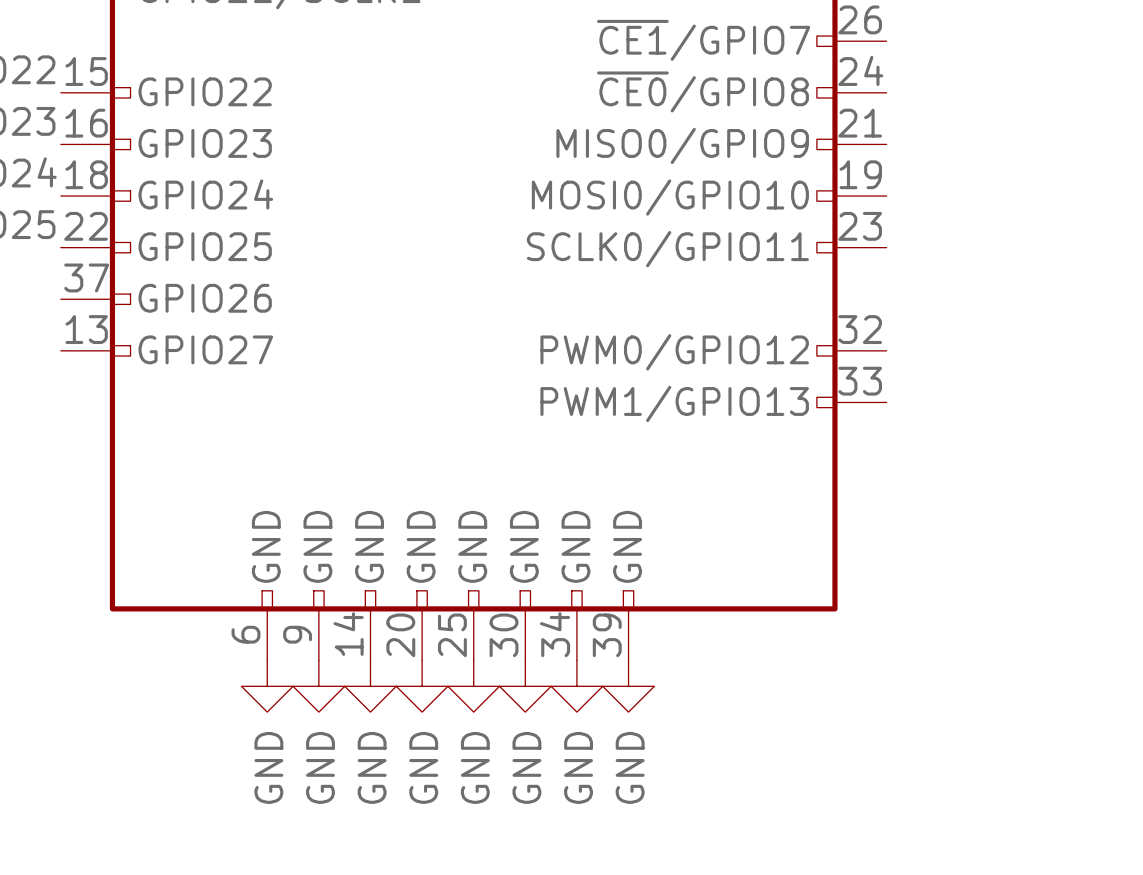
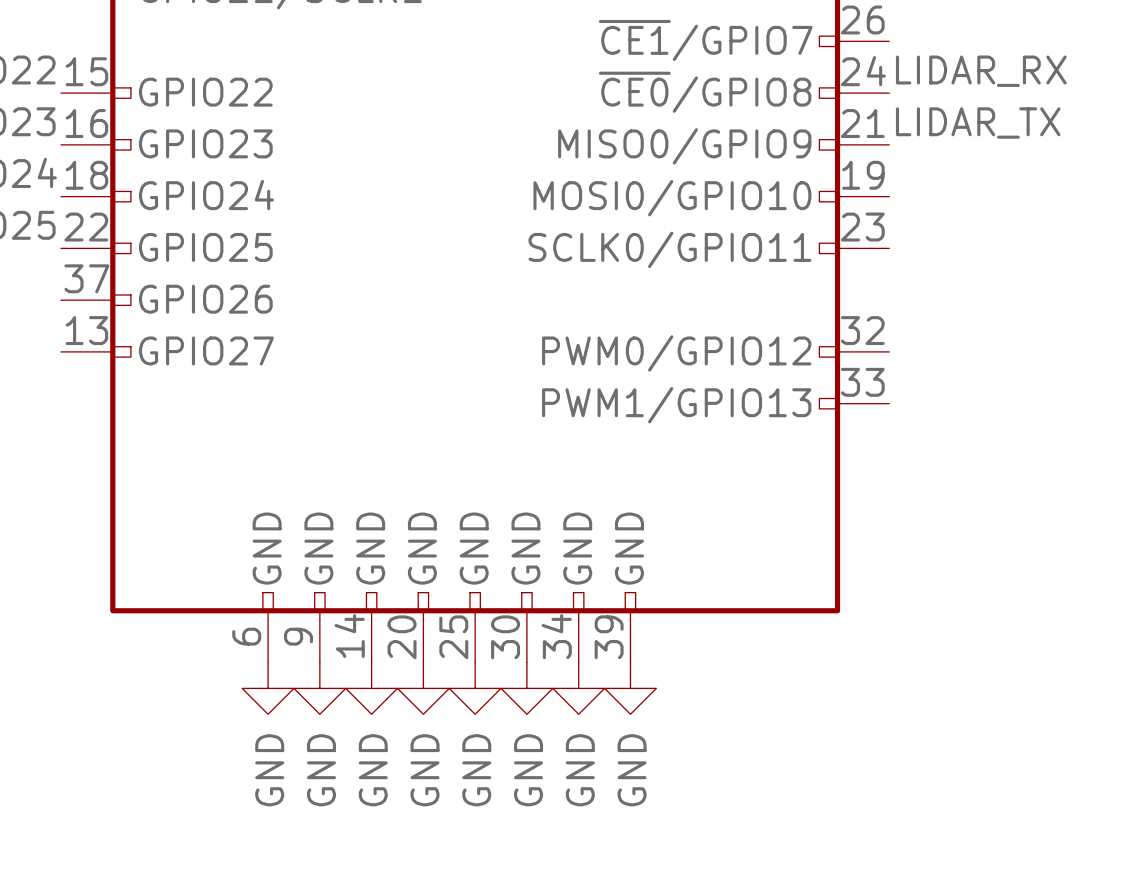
label: none -> LIDAR_RX (981, 71)
label: none -> LIDAR_TX (978, 123)

